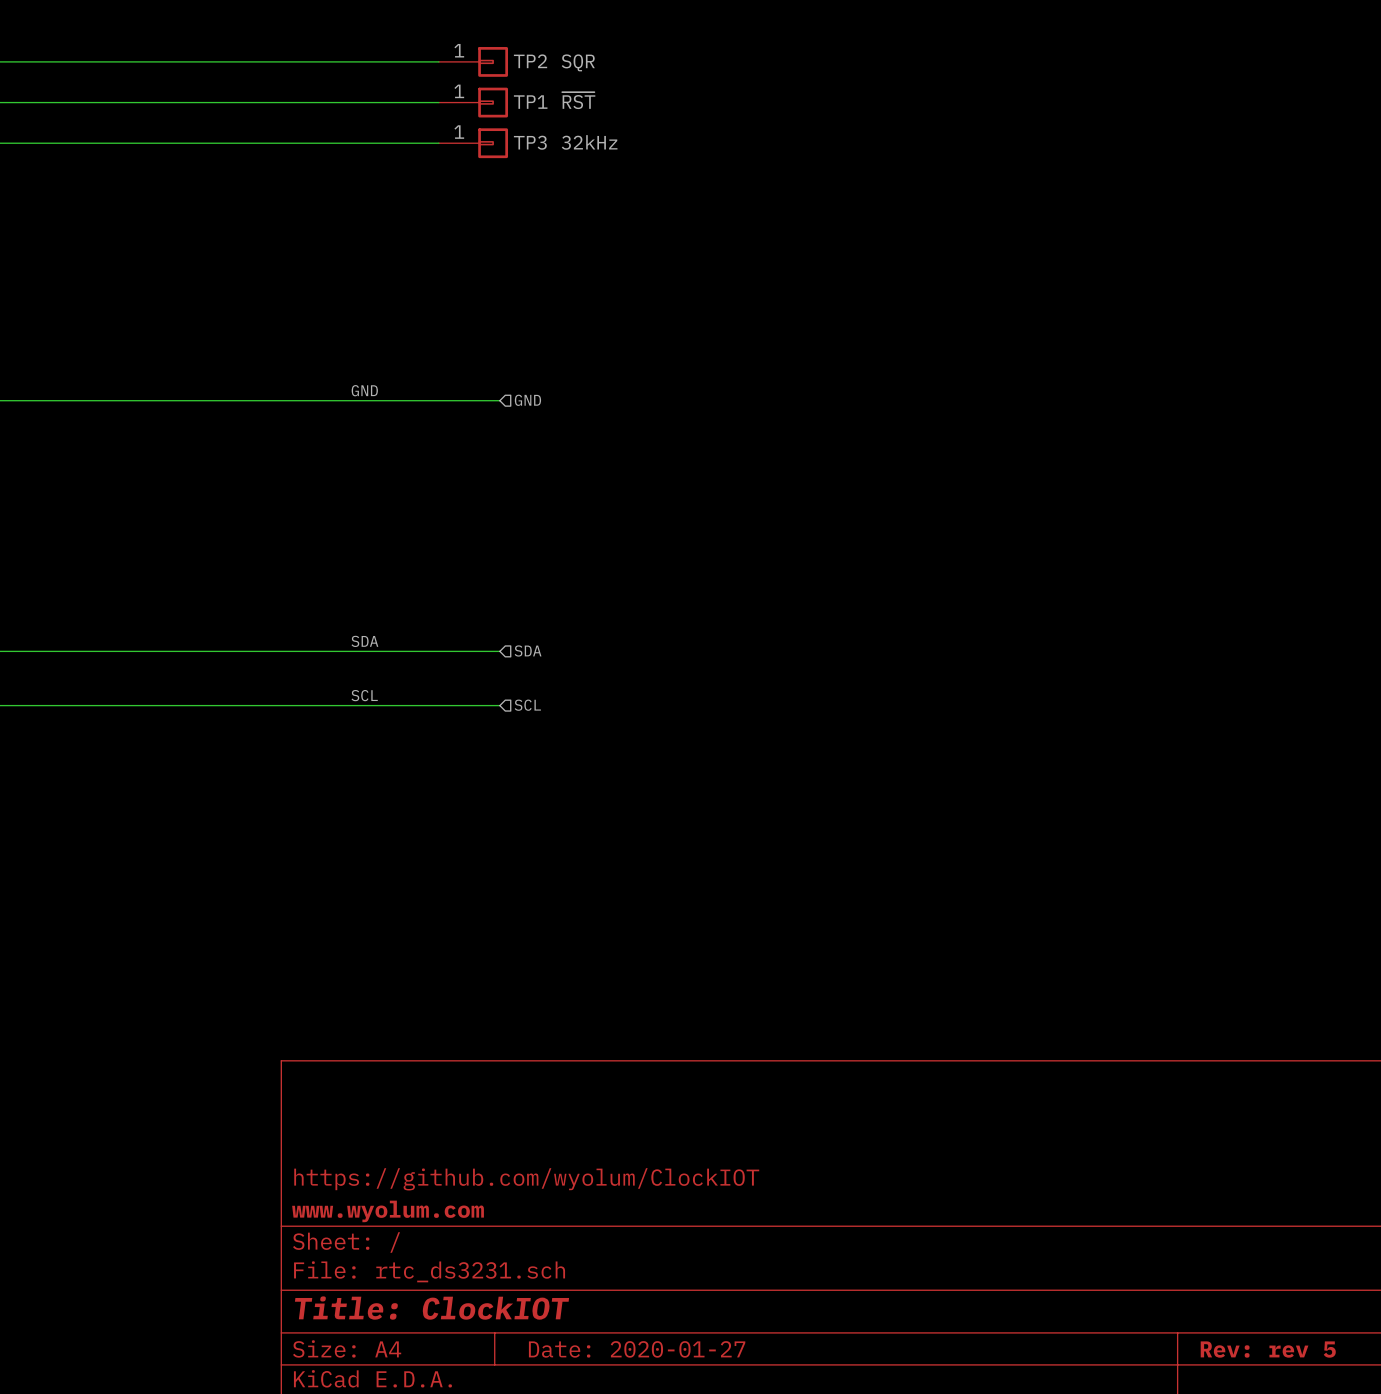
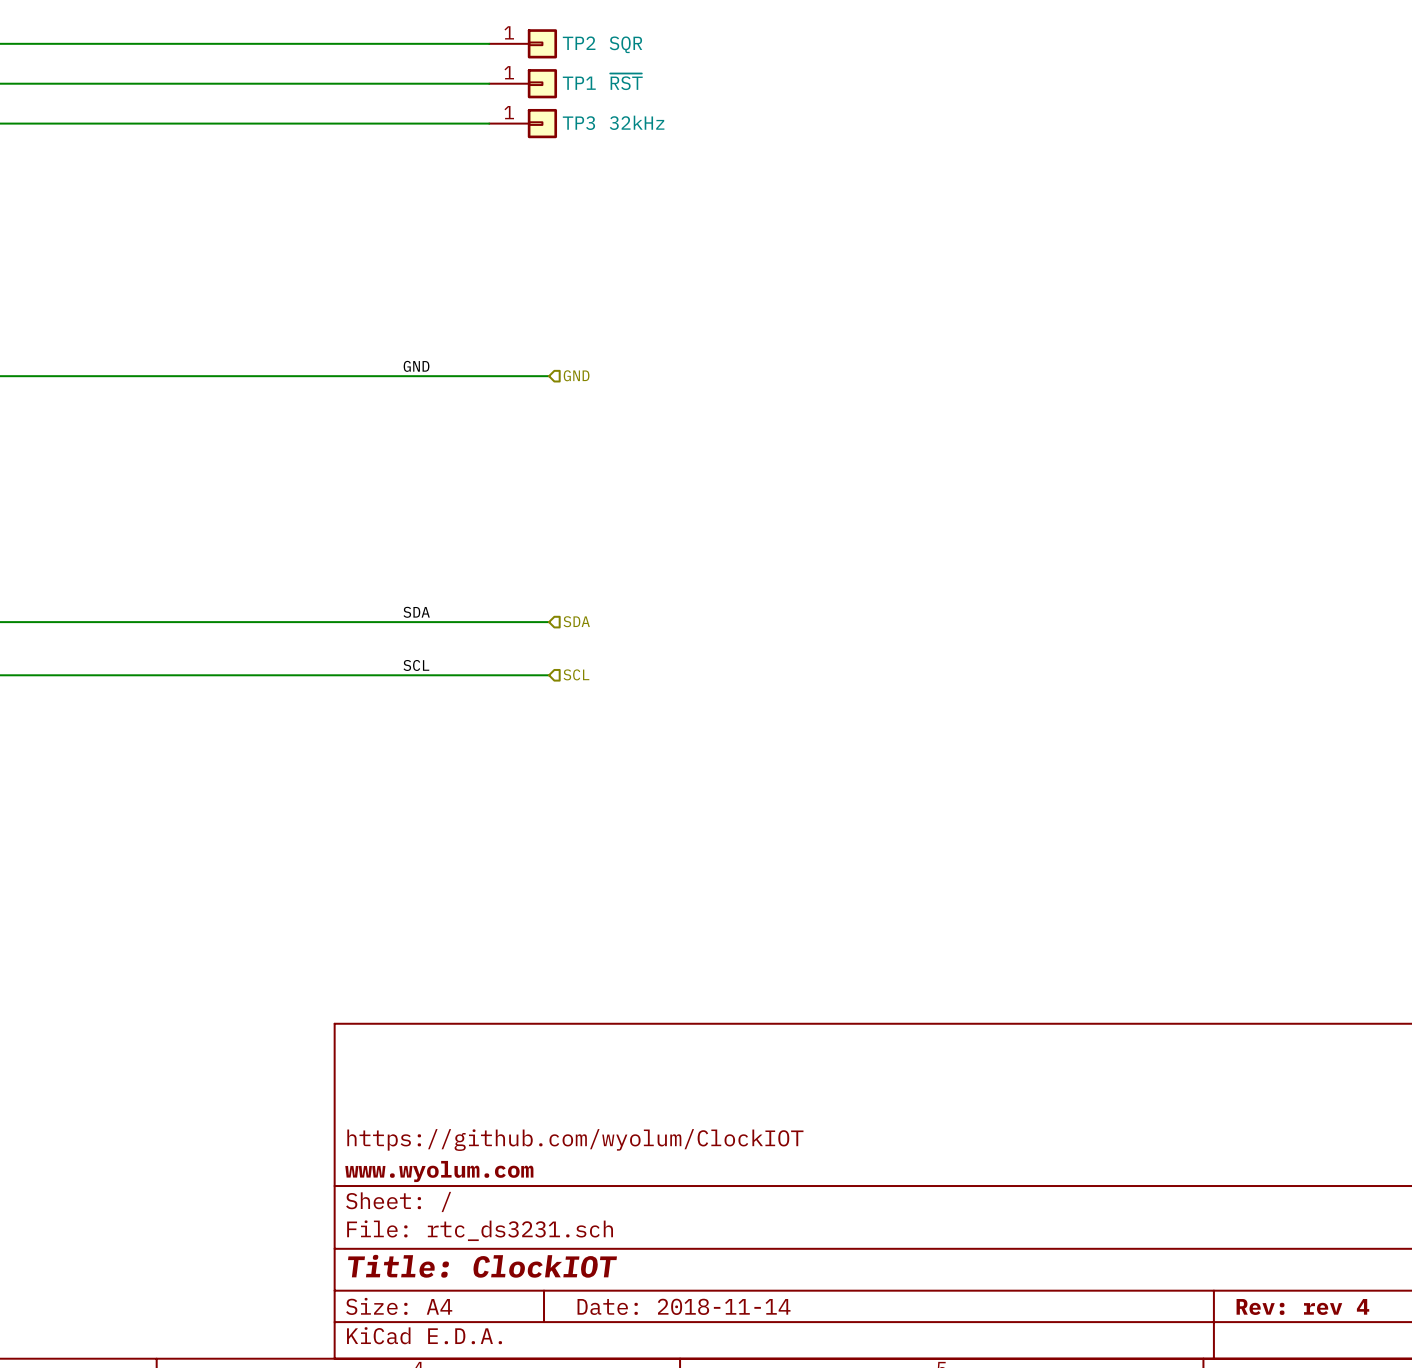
title block: Date: 2020-01-27 (637, 1349) -> Date: 2018-11-14 (684, 1306)
title block: Rev: rev 5 (1268, 1349) -> Rev: rev 4 (1302, 1306)

